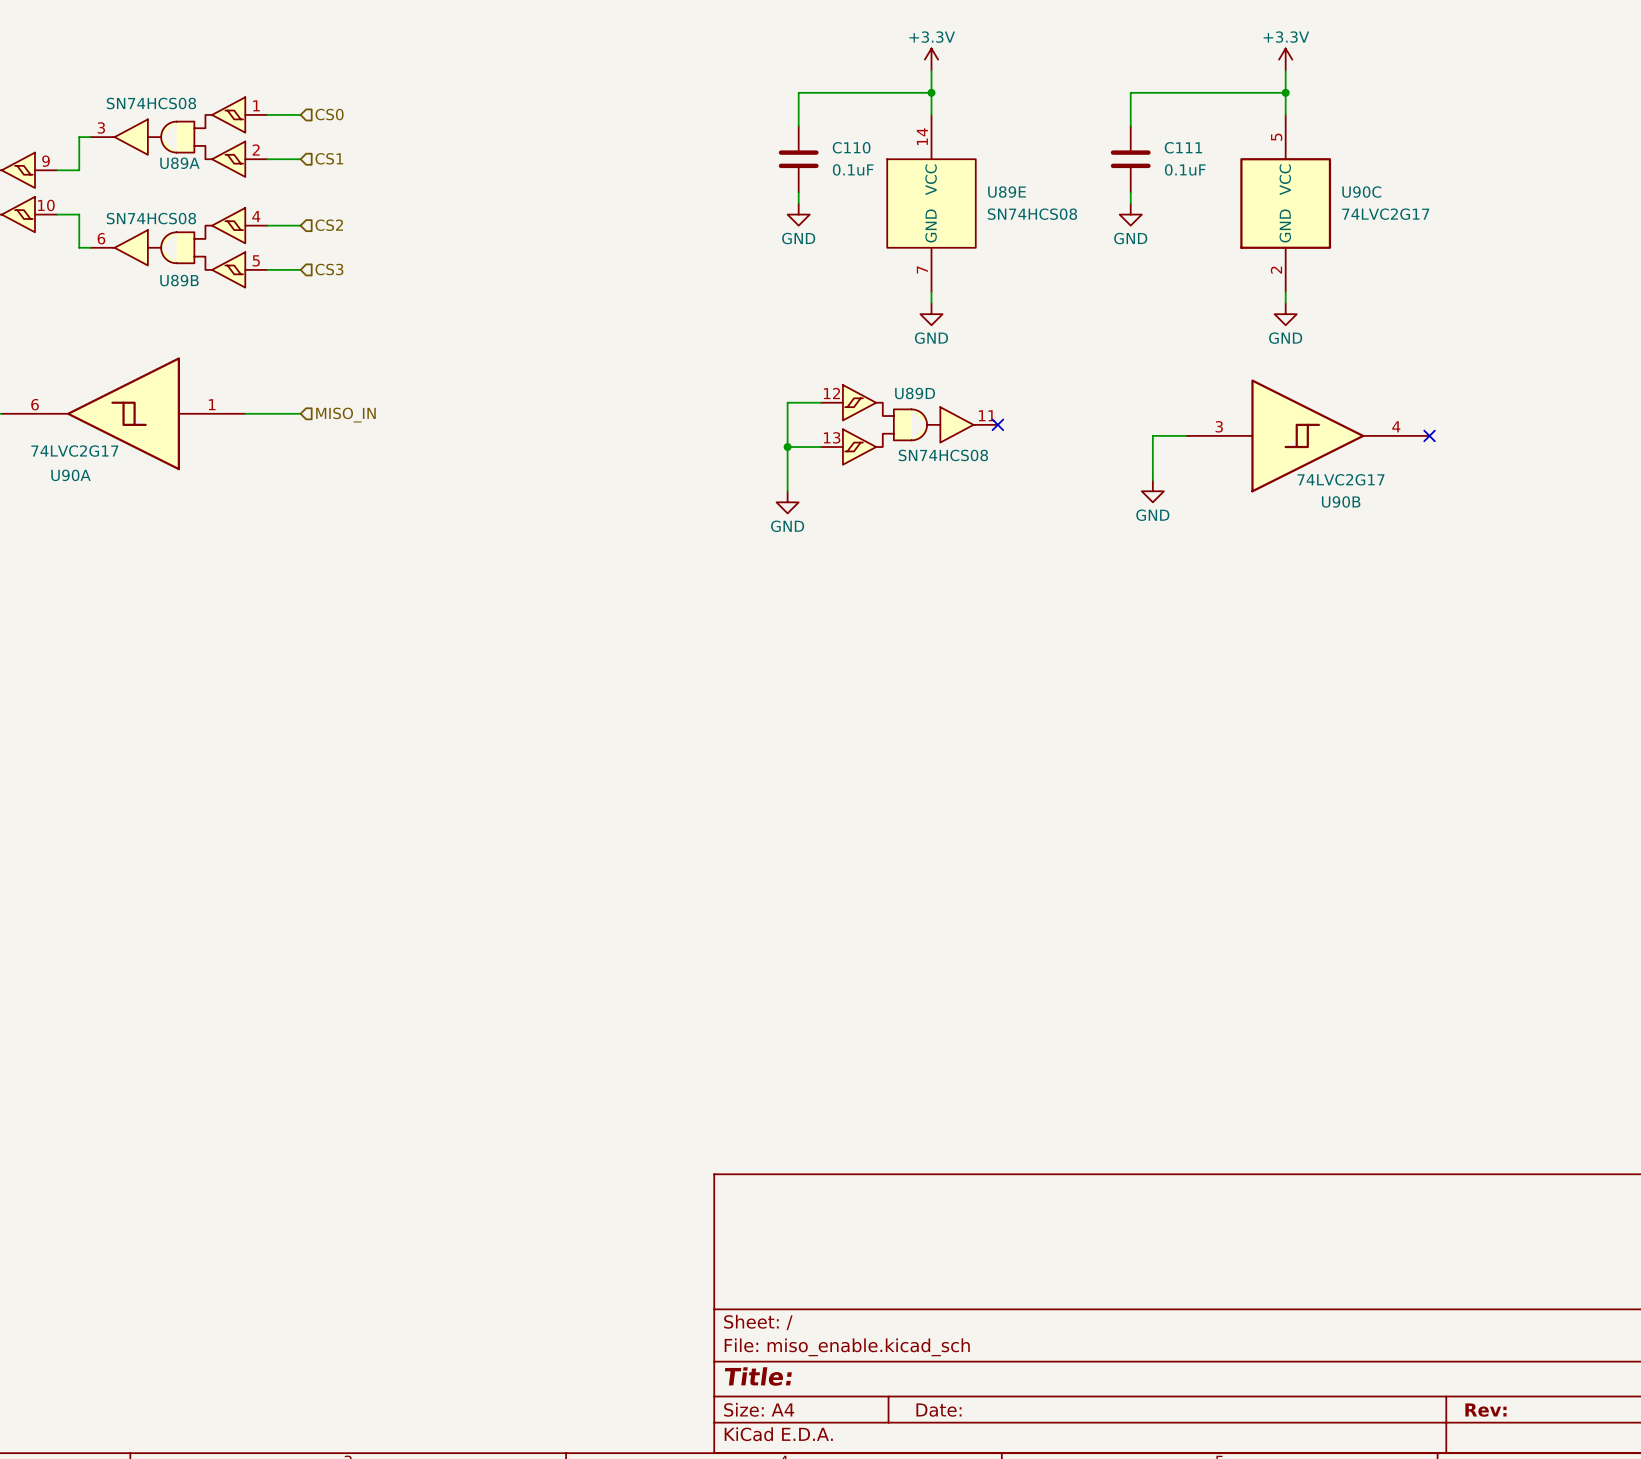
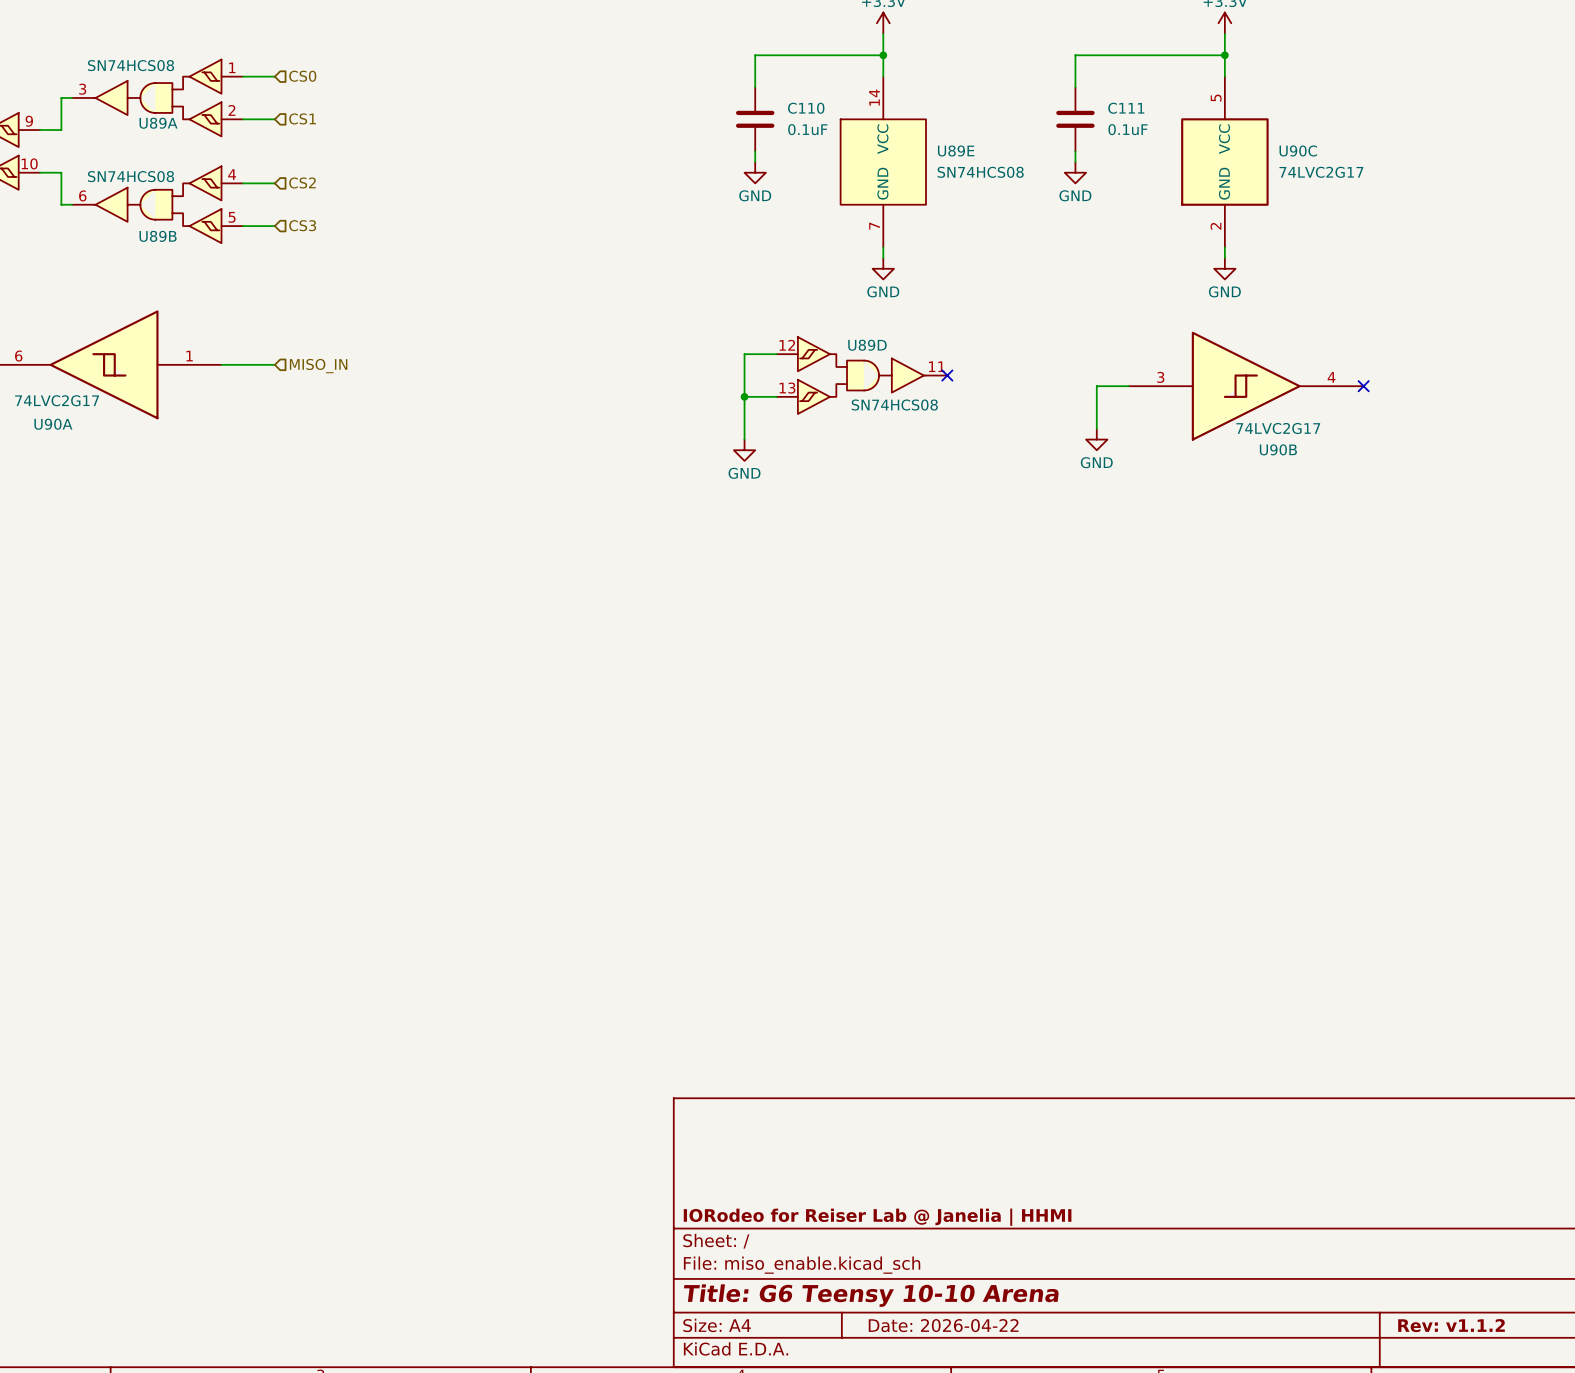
title block: none -> IORodeo for Reiser Lab @ Janelia | HHMI (877, 1217)
title block: Title: (758, 1376) -> Title: G6 Teensy 10-10 Arena (871, 1295)
title block: Date: (938, 1410) -> Date: 2026-04-22 (943, 1325)
title block: Rev: (1485, 1410) -> Rev: v1.1.2 (1451, 1325)

